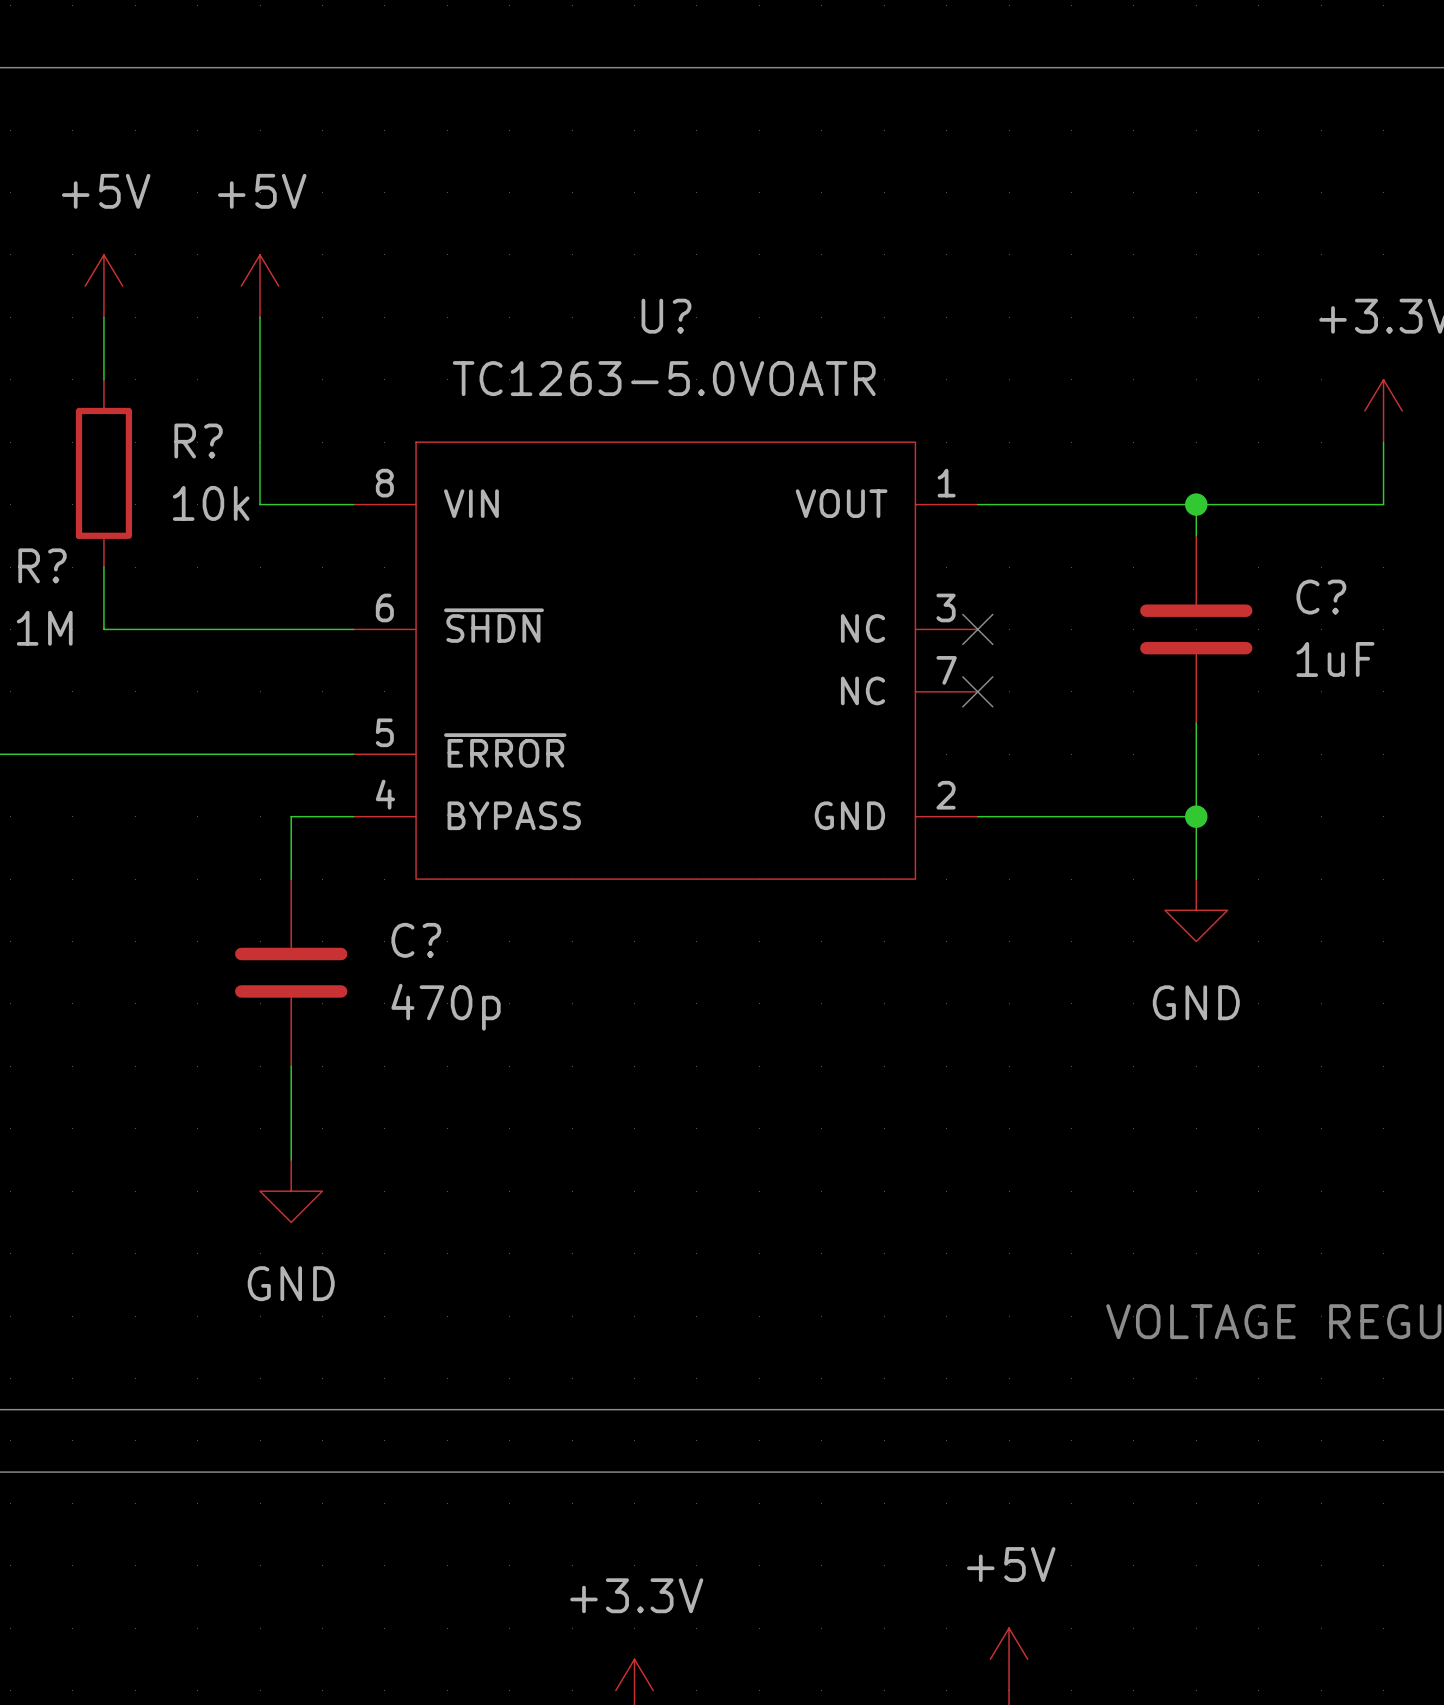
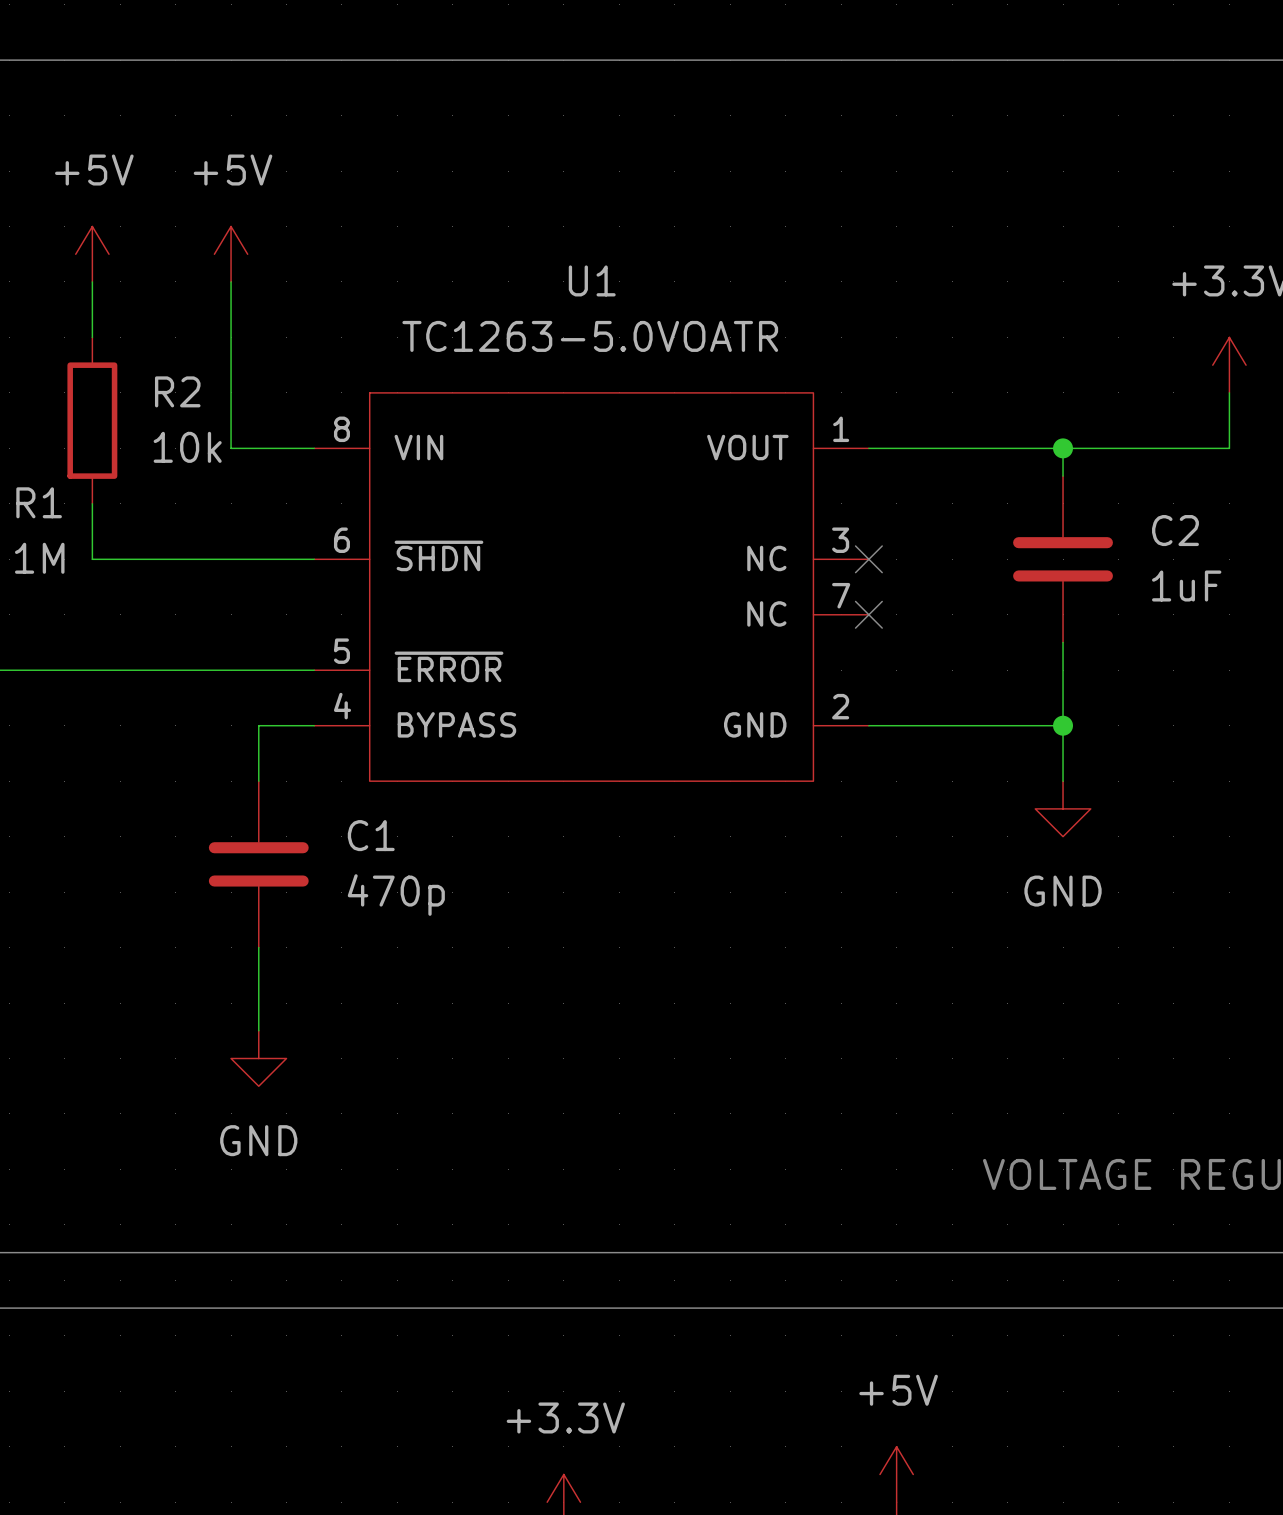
U? name: U? (666, 316) -> U1 (592, 280)
R? name: R? (198, 441) -> R2 (177, 391)
R? name: R? (42, 565) -> R1 (39, 502)
C? name: C? (1321, 597) -> C2 (1175, 530)
C? name: C? (416, 940) -> C1 (371, 835)

